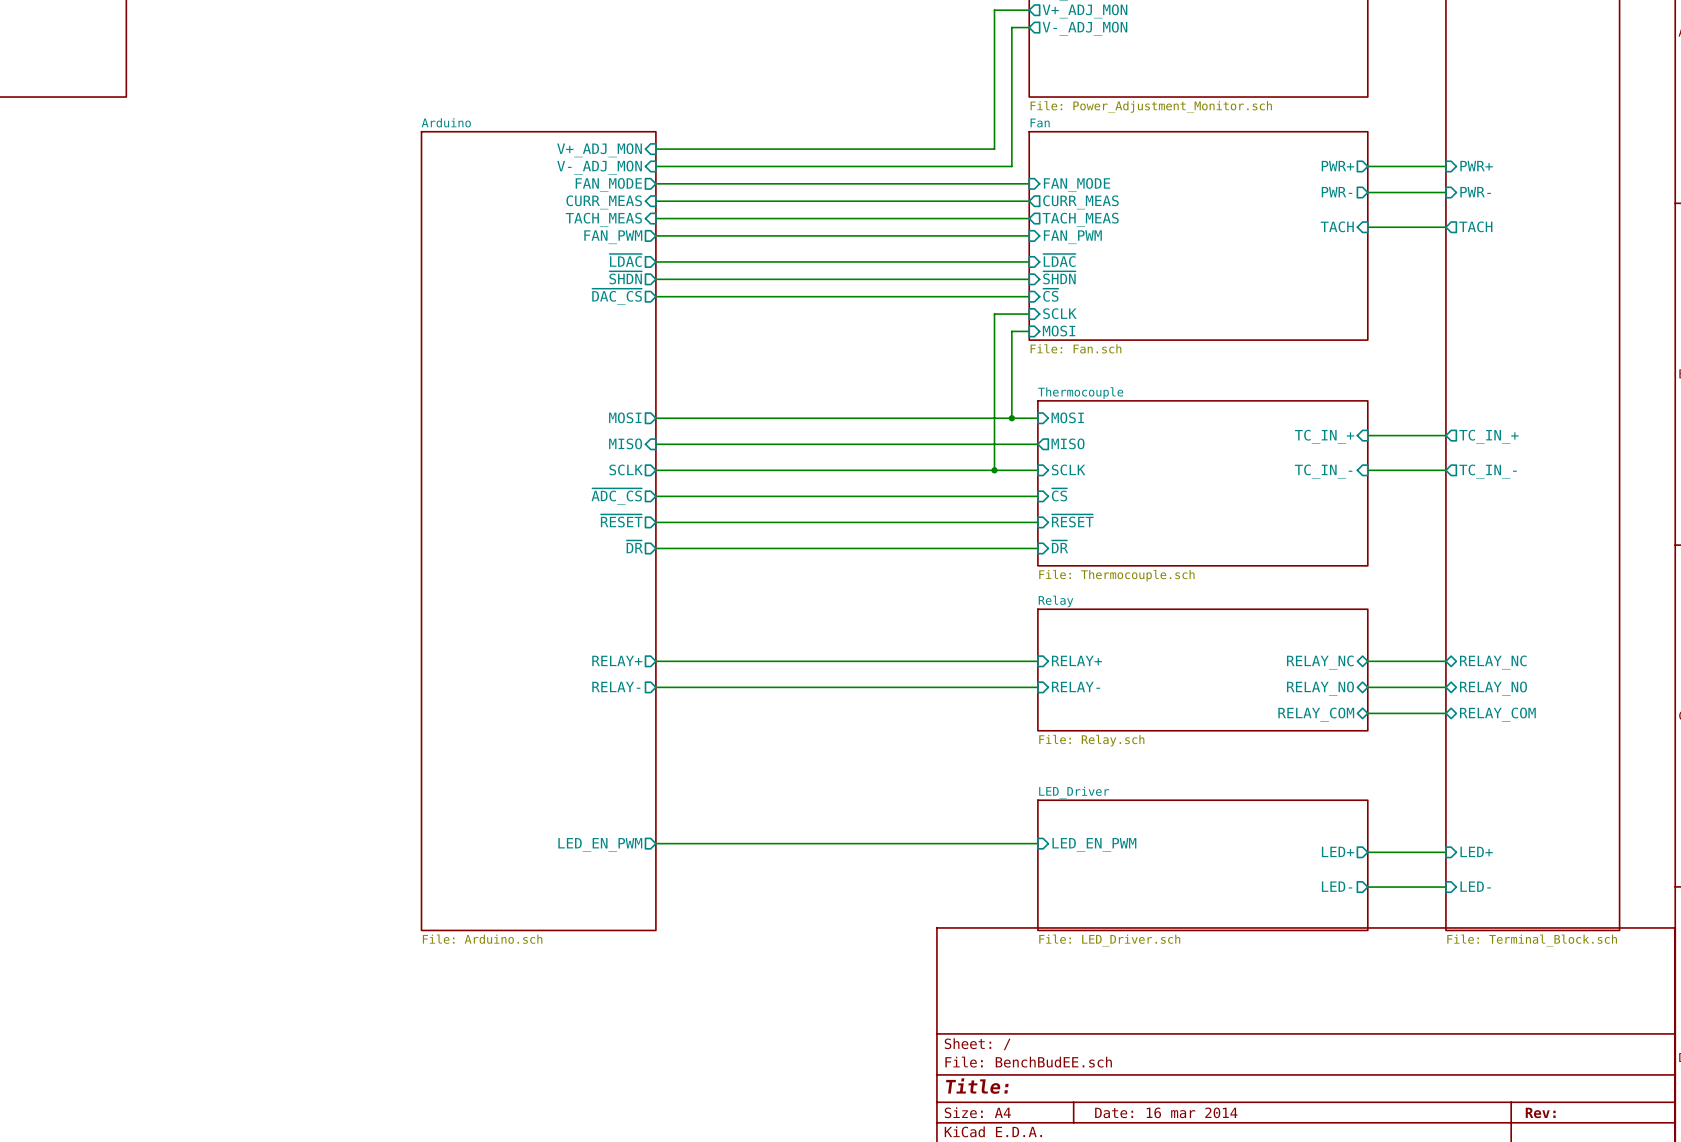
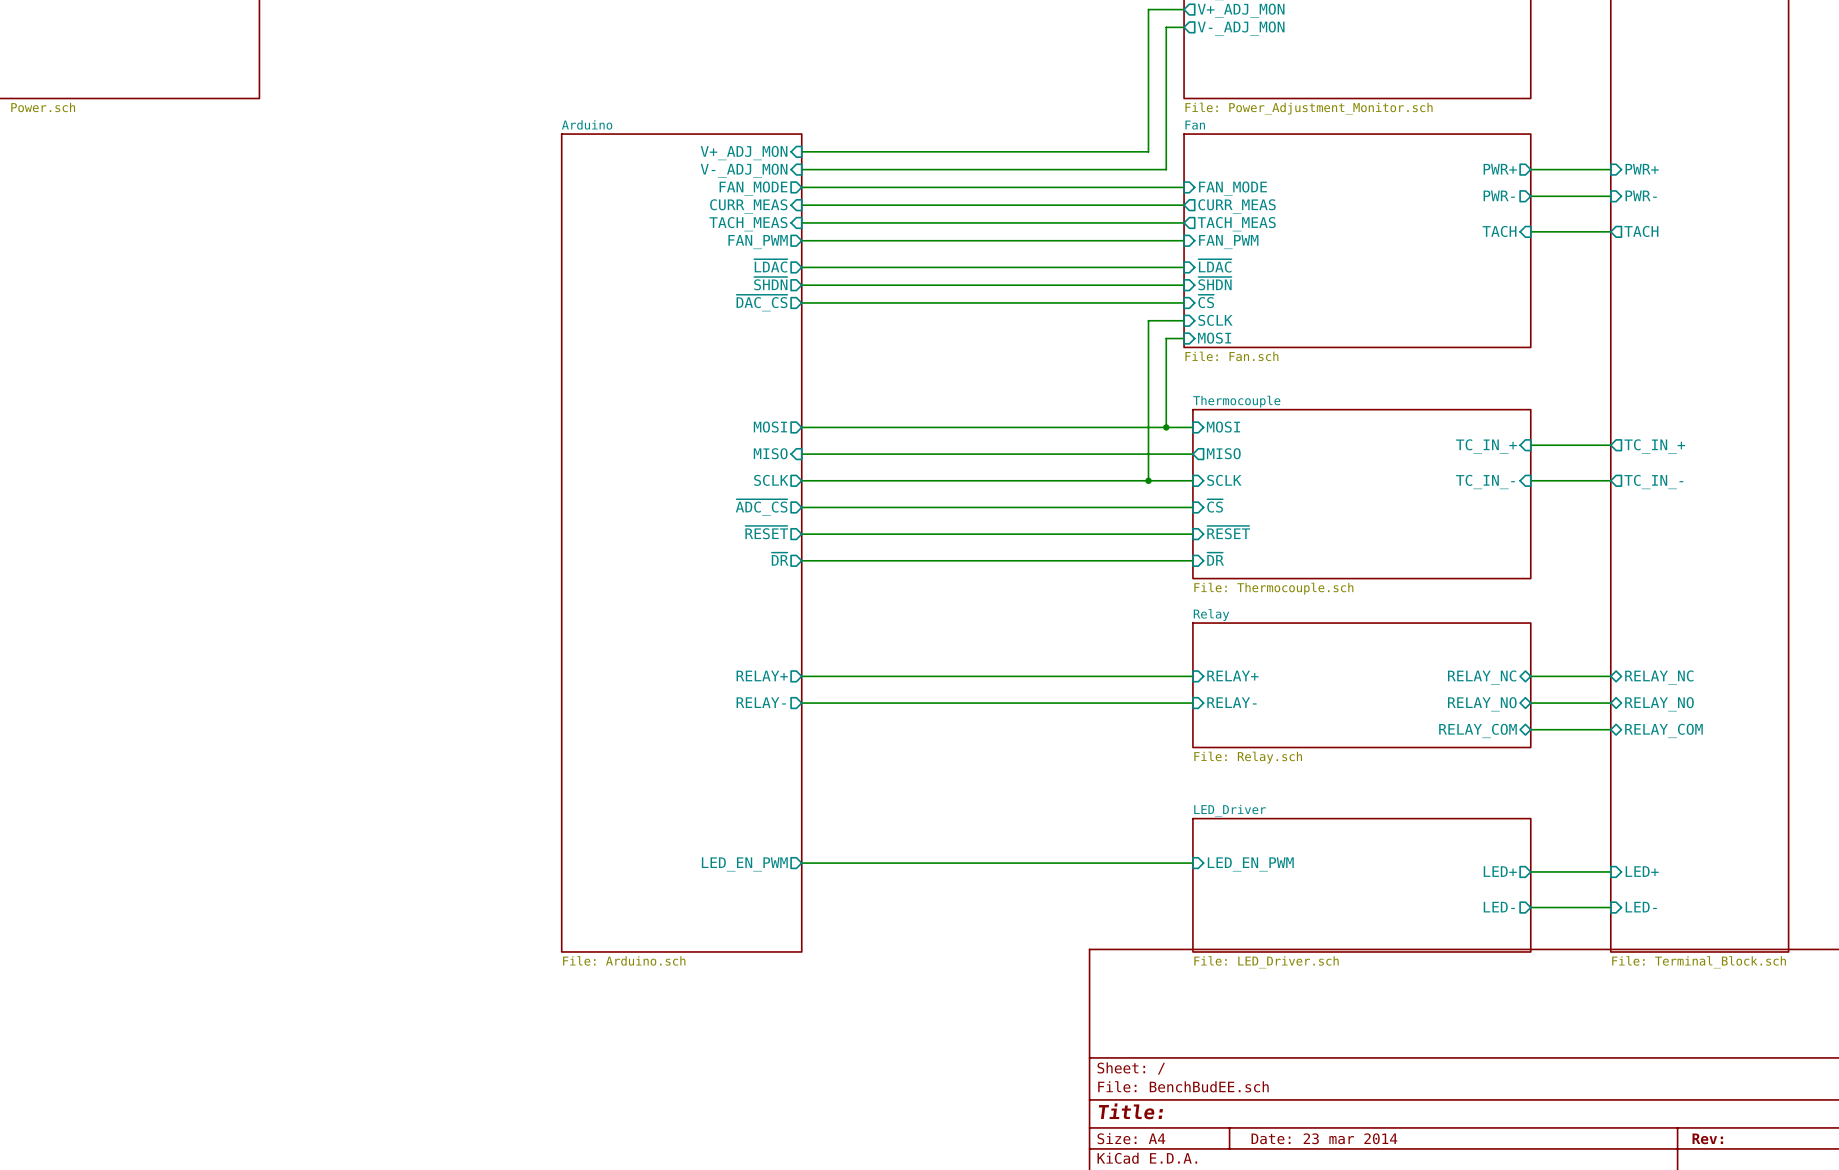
title block: Date: 16 mar 2014 (1166, 1112) -> Date: 23 mar 2014 (1324, 1138)

